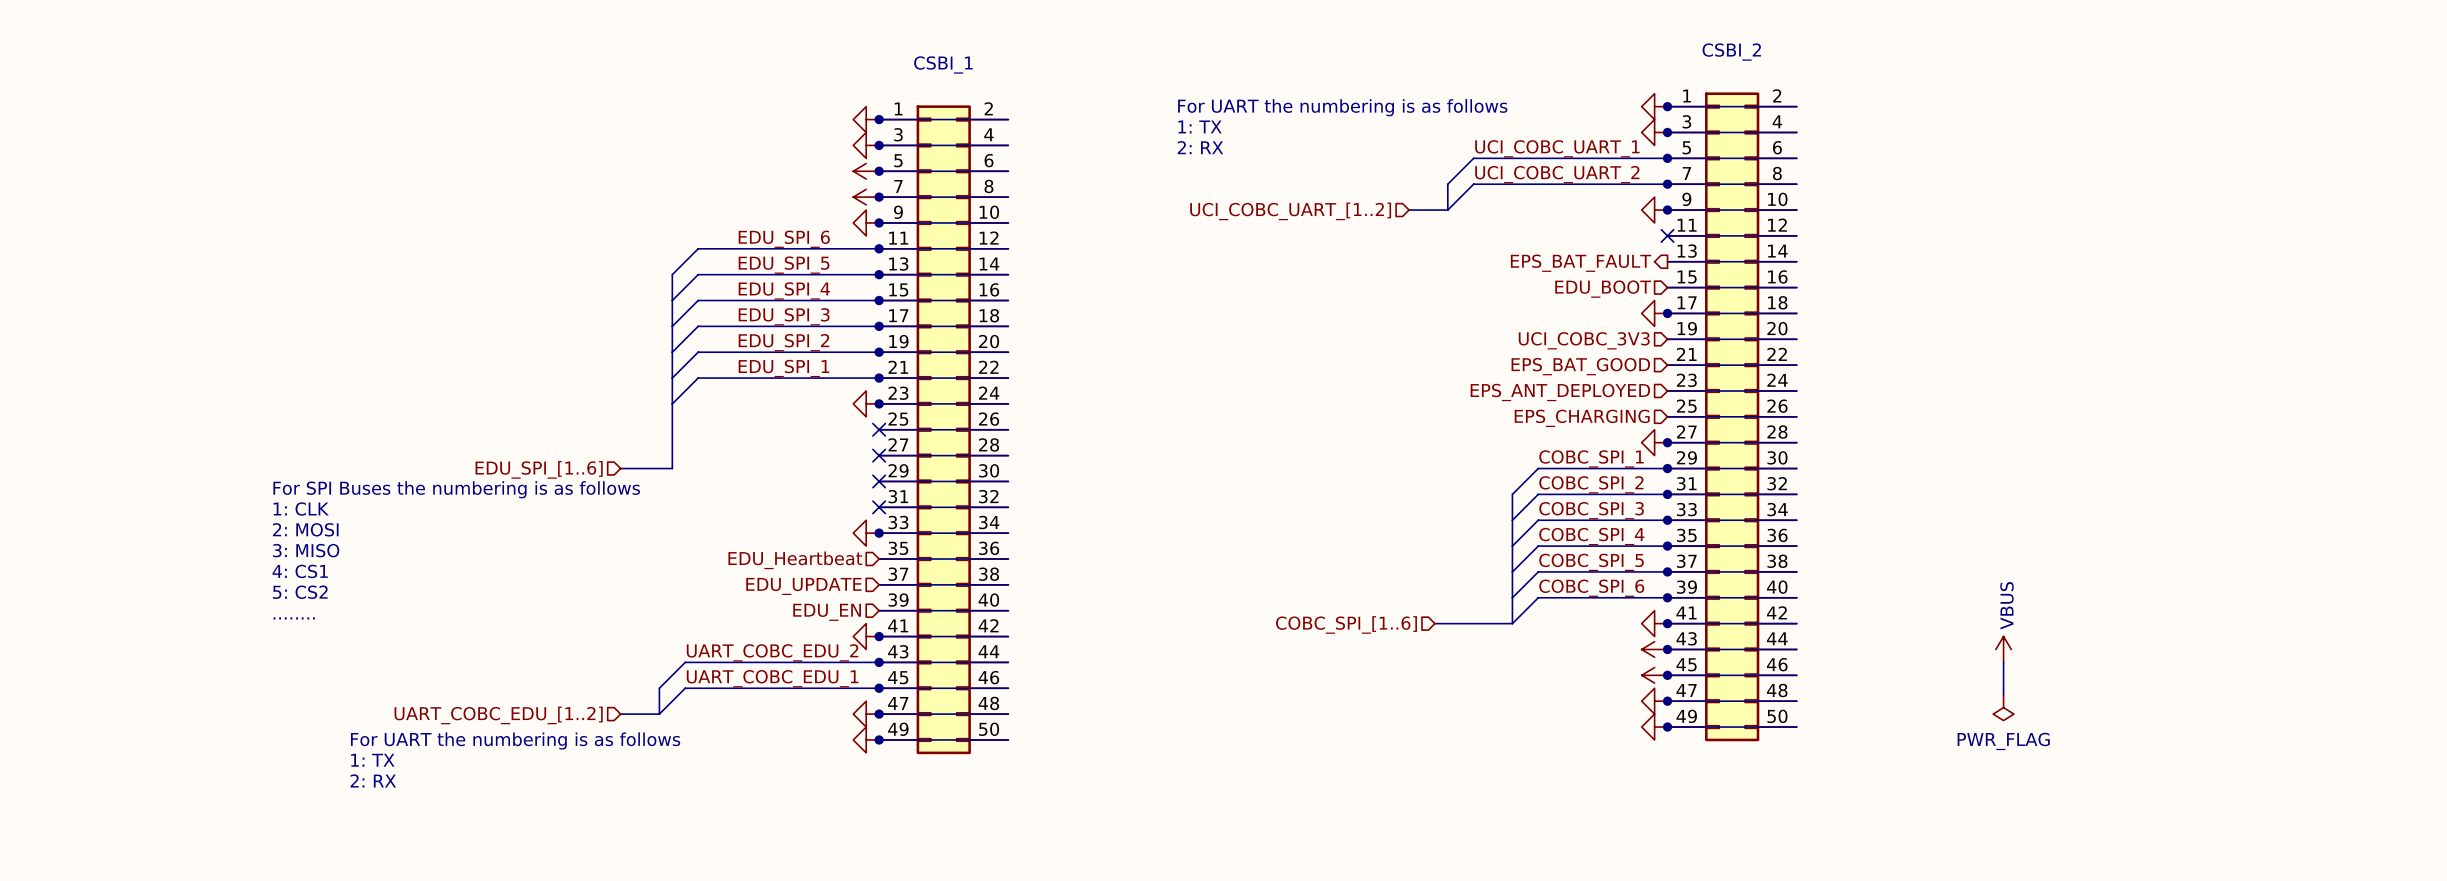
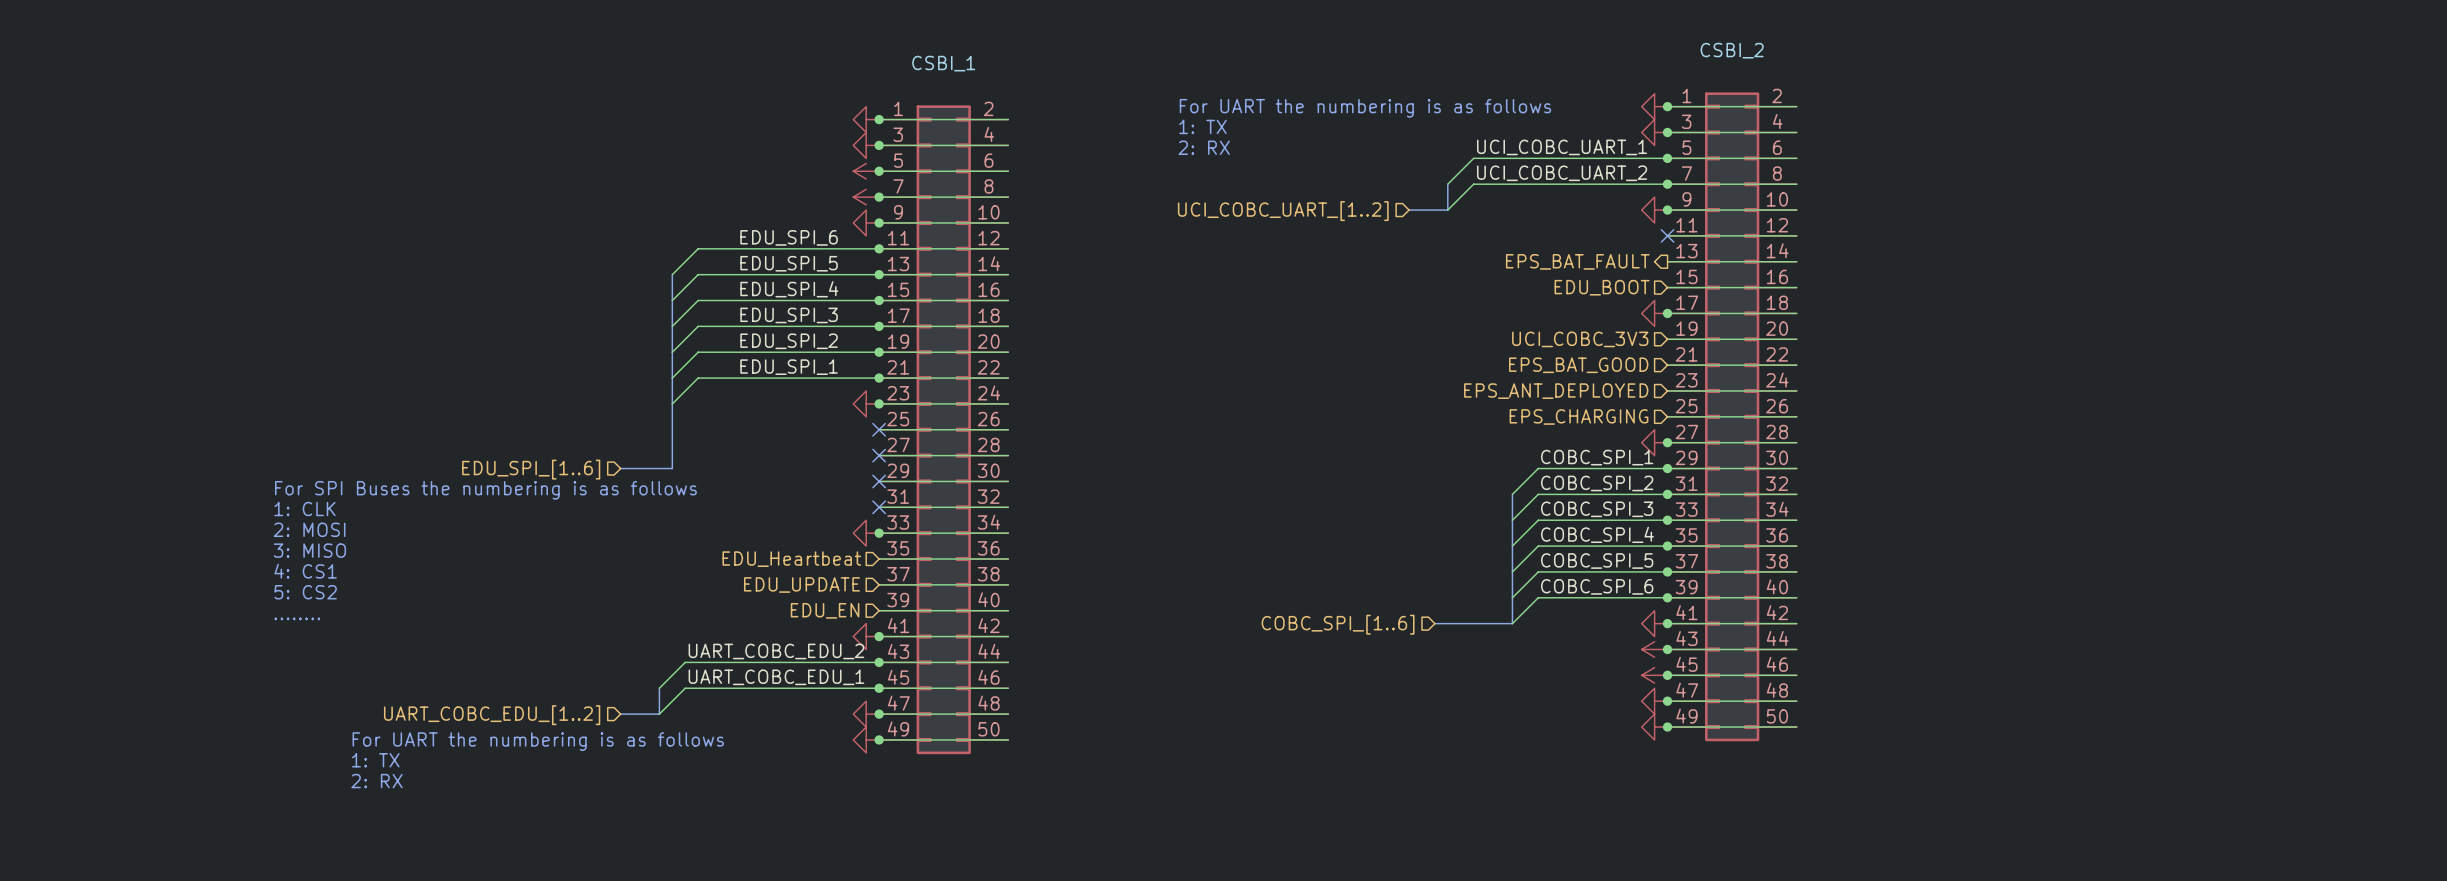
power symbol: VBUS (2003, 649) -> none
wire: (2003, 662) (2003, 694) -> none
power symbol: PWR_FLAG (2003, 707) -> none

